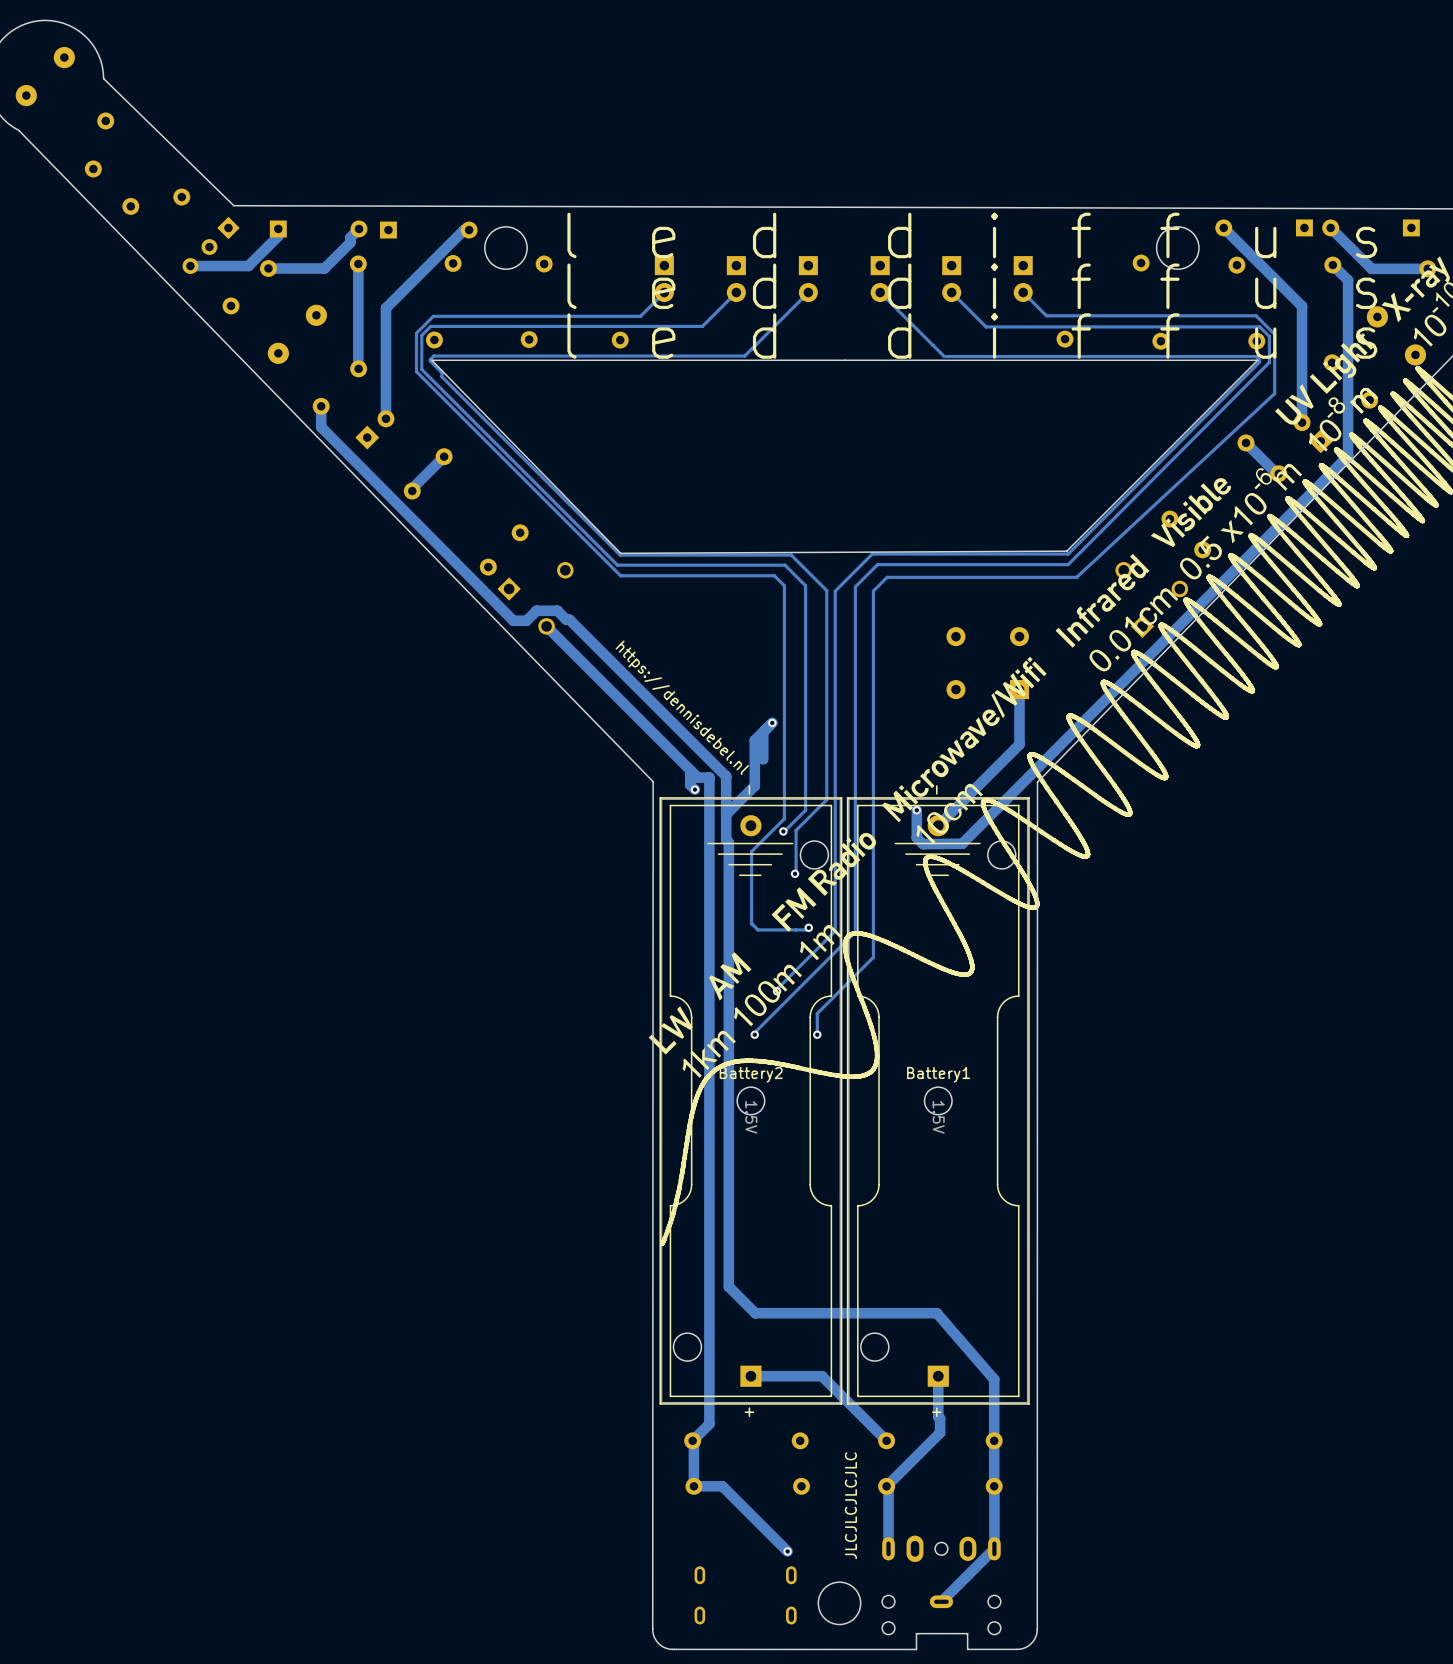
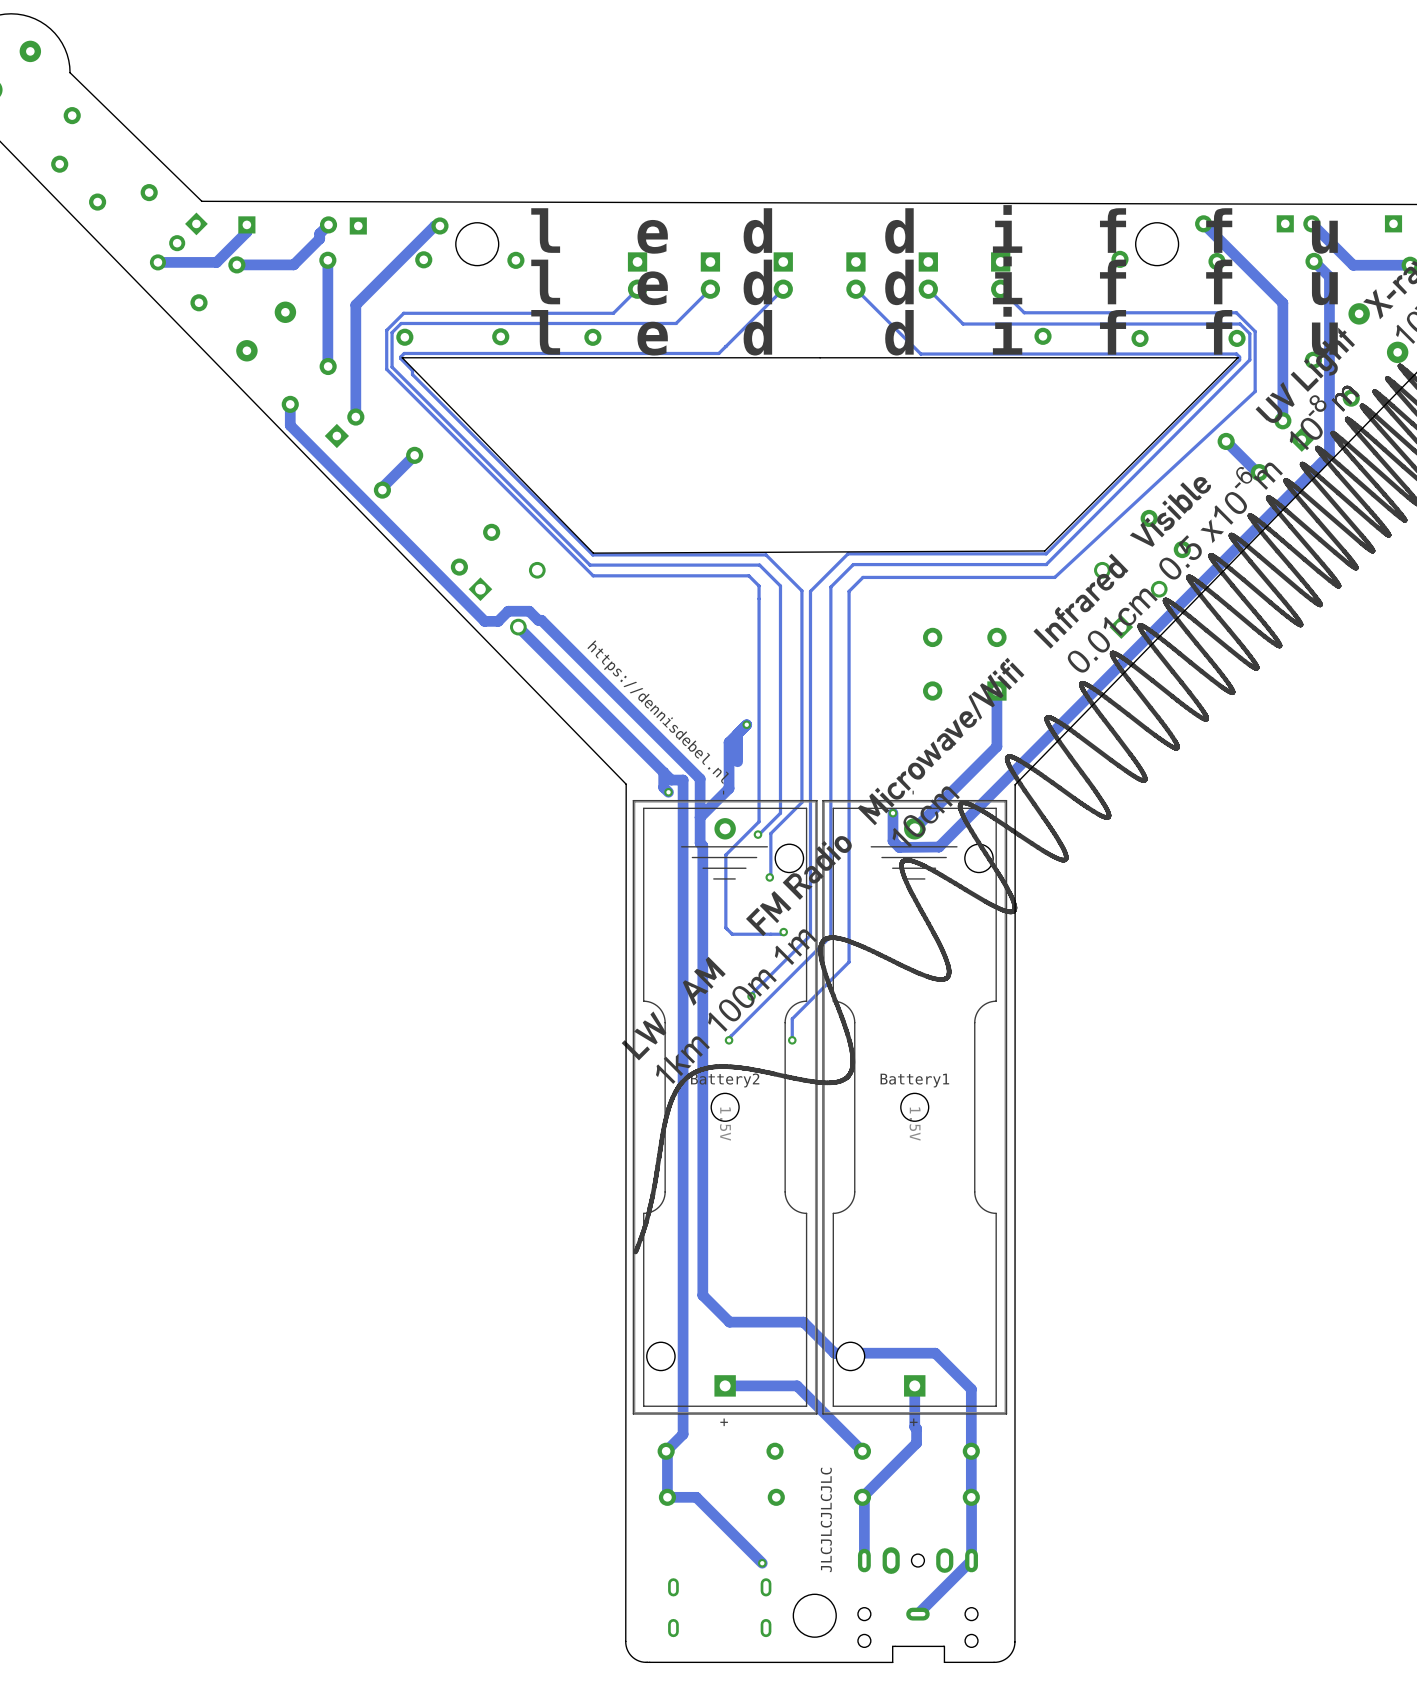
track: (828, 1313) (936, 1313) (994, 1379) -> (803, 1322) (834, 1353) (935, 1353) (971, 1389)

